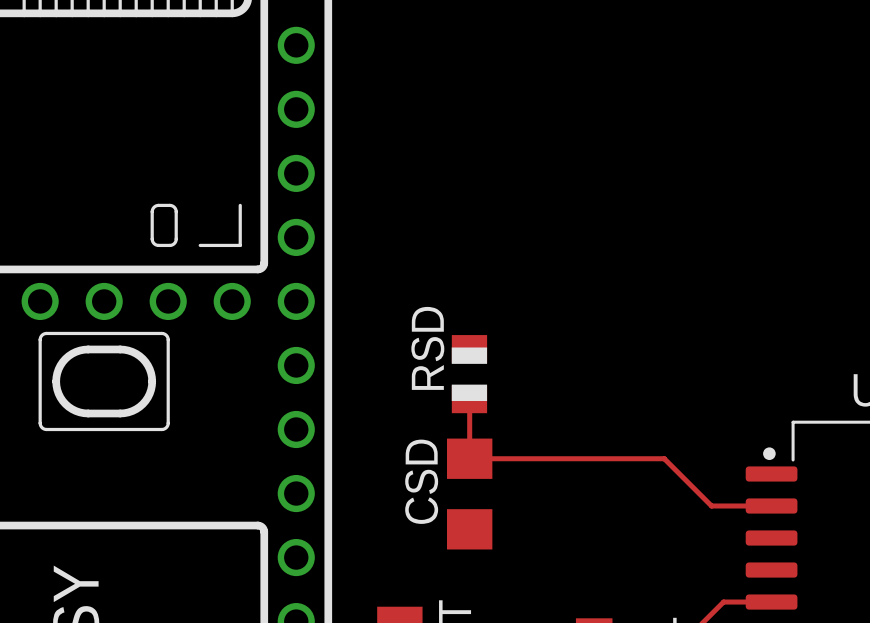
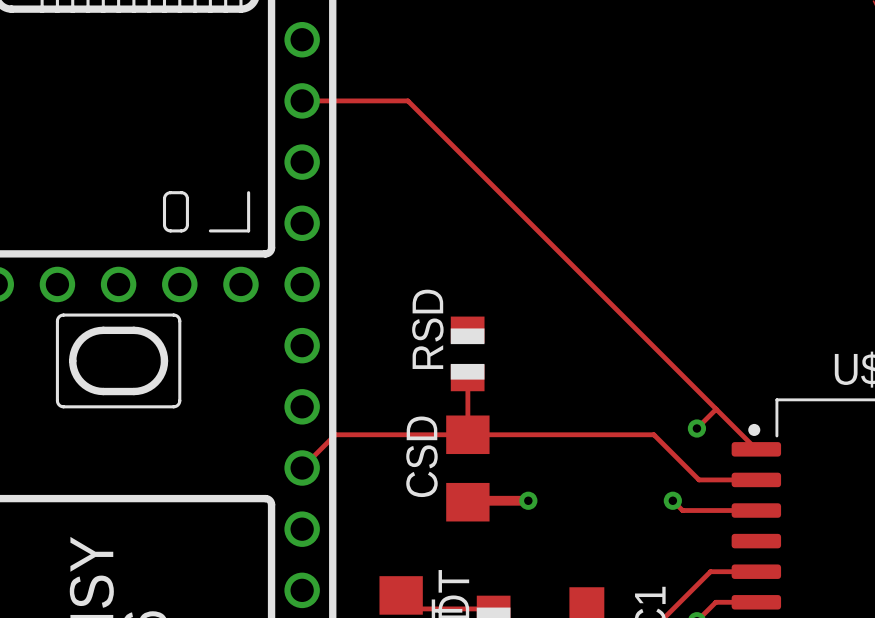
track: none -> (302, 100) (407, 100) (756, 449)
track: none -> (716, 409) (696, 428)
via: none -> (696, 428)
track: none -> (467, 434) (335, 434) (302, 468)
track: none -> (528, 500) (467, 502)
via: none -> (528, 500)
track: none -> (672, 500) (682, 510) (756, 510)
via: none -> (672, 500)

